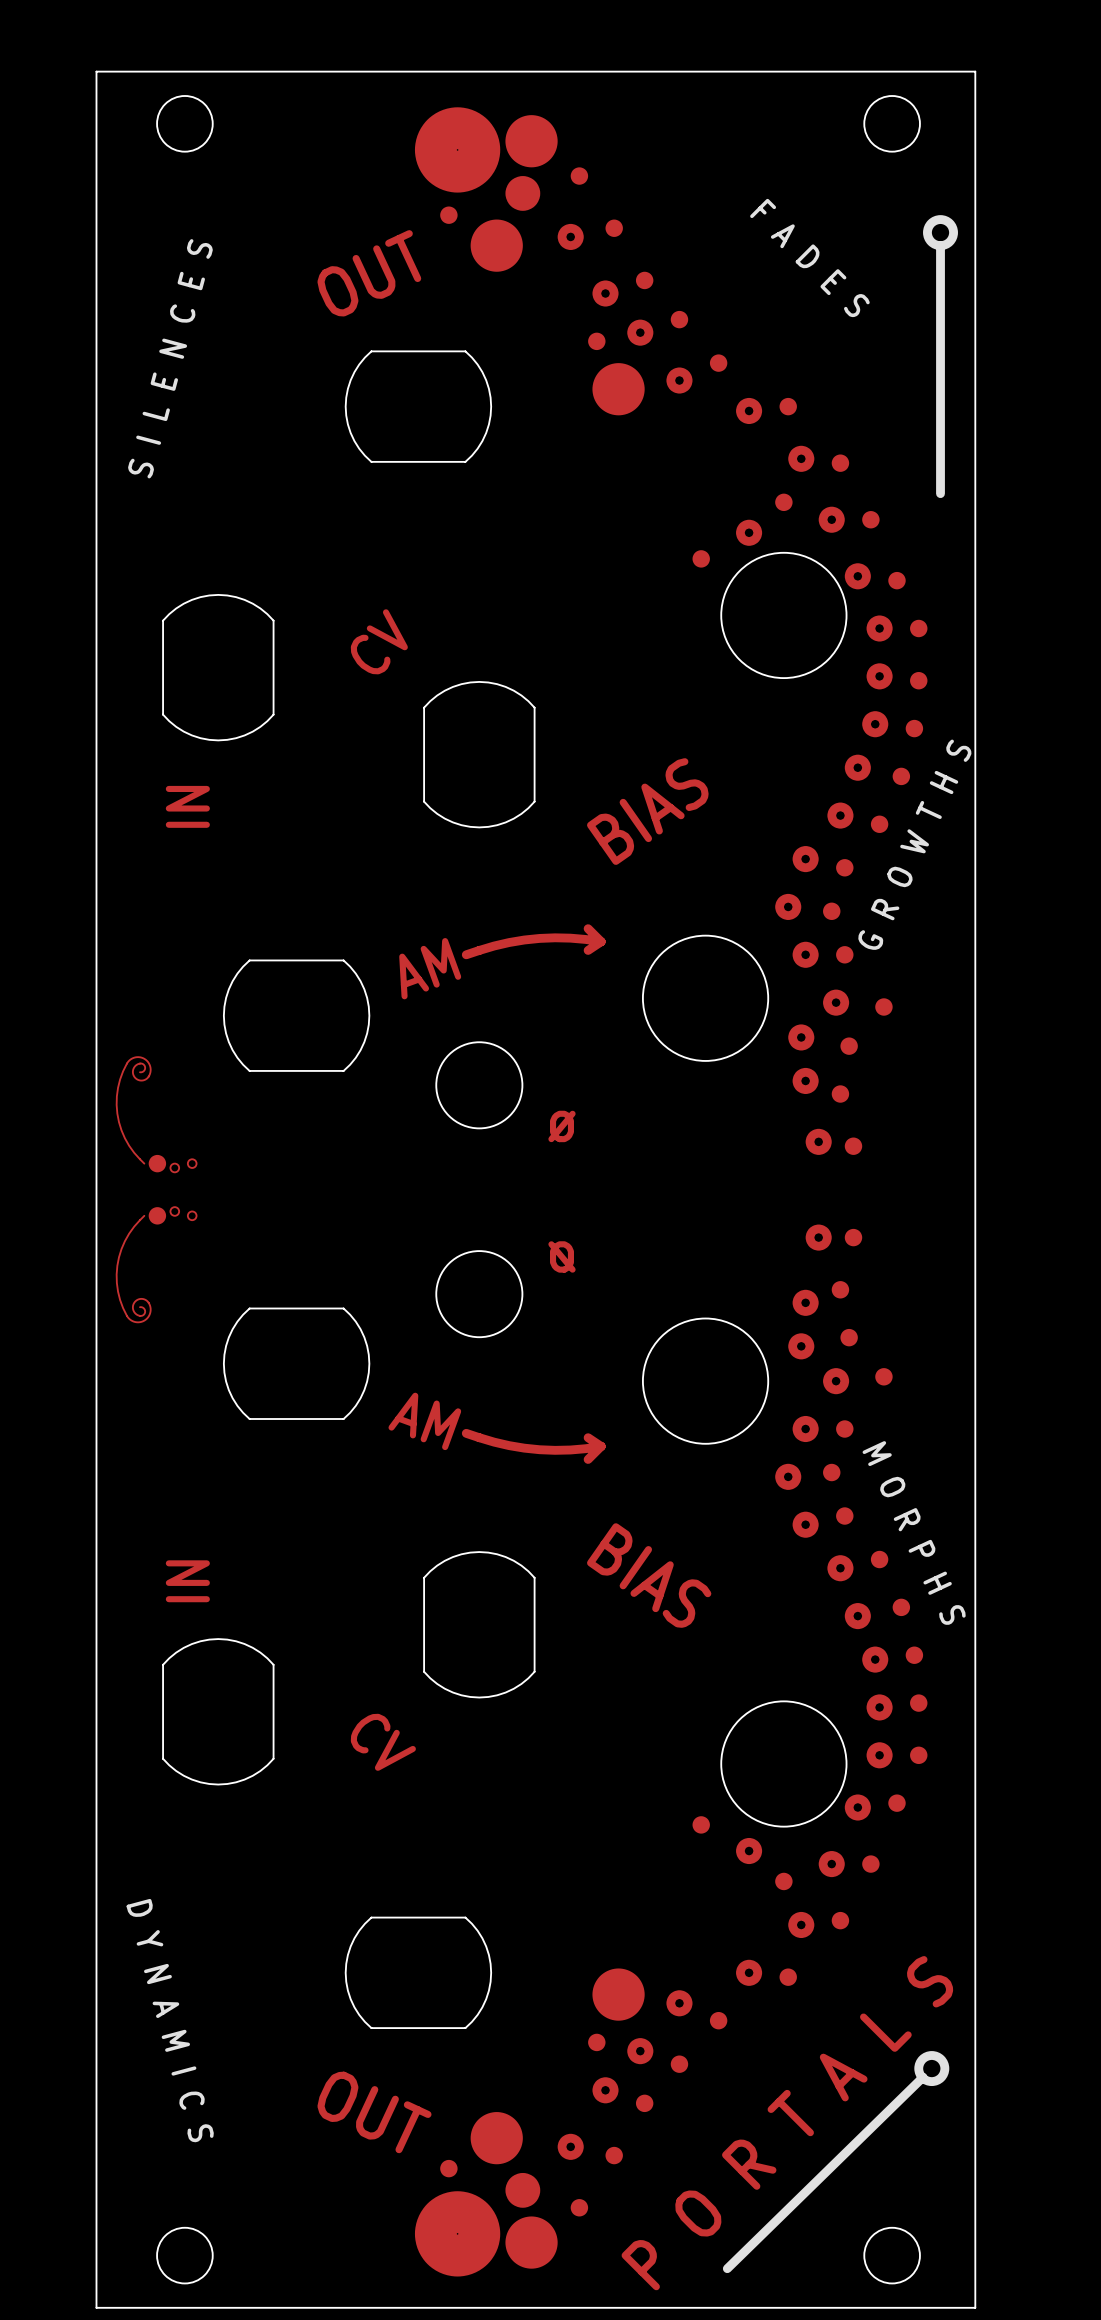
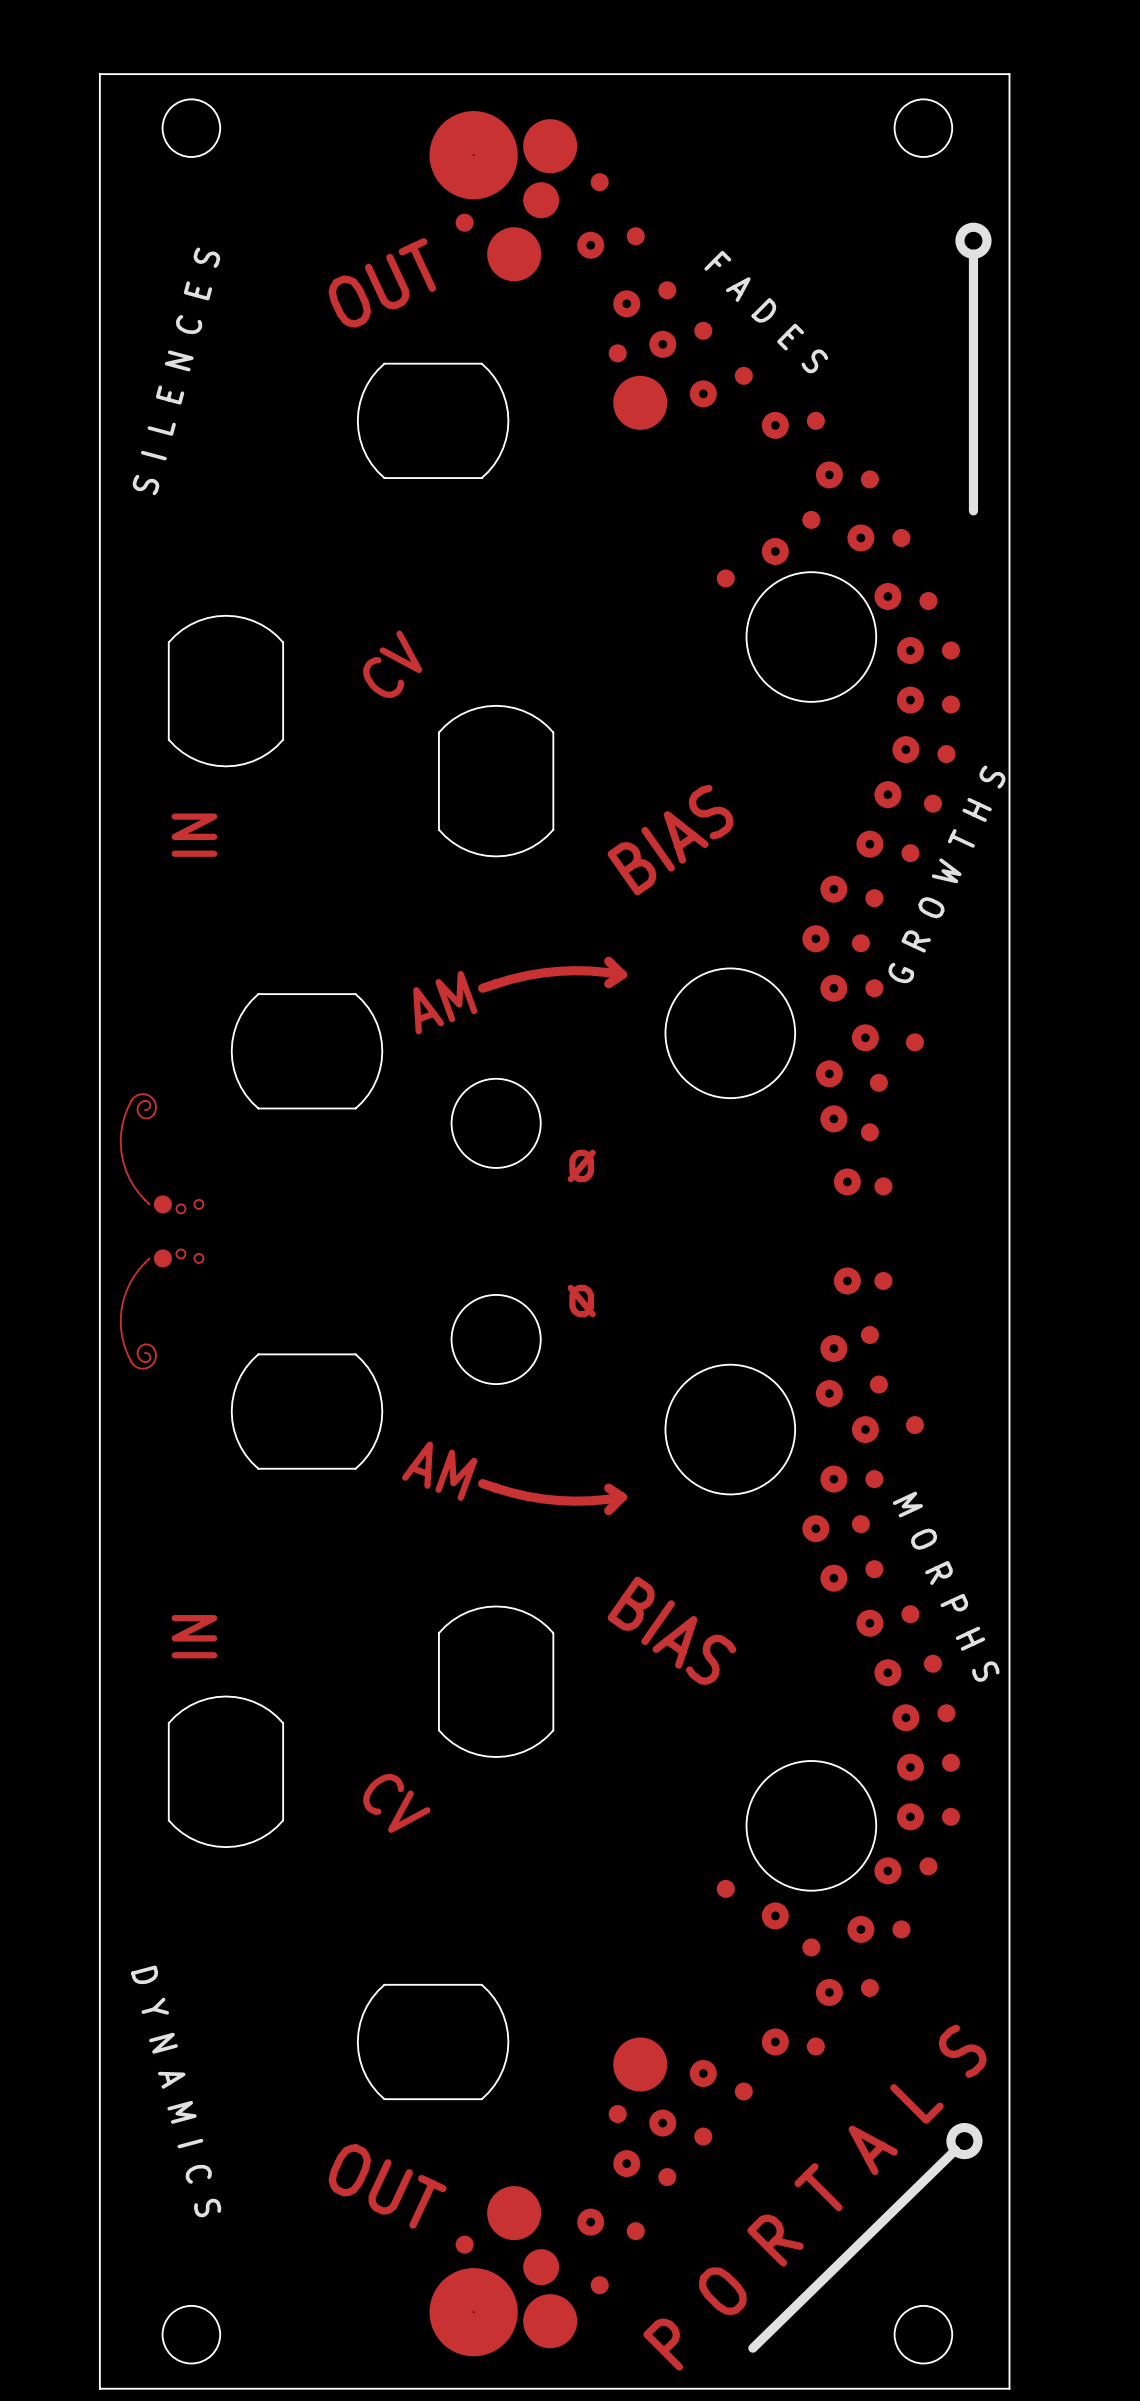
text position: F A D E S (809, 257) -> F A D E S (766, 312)

